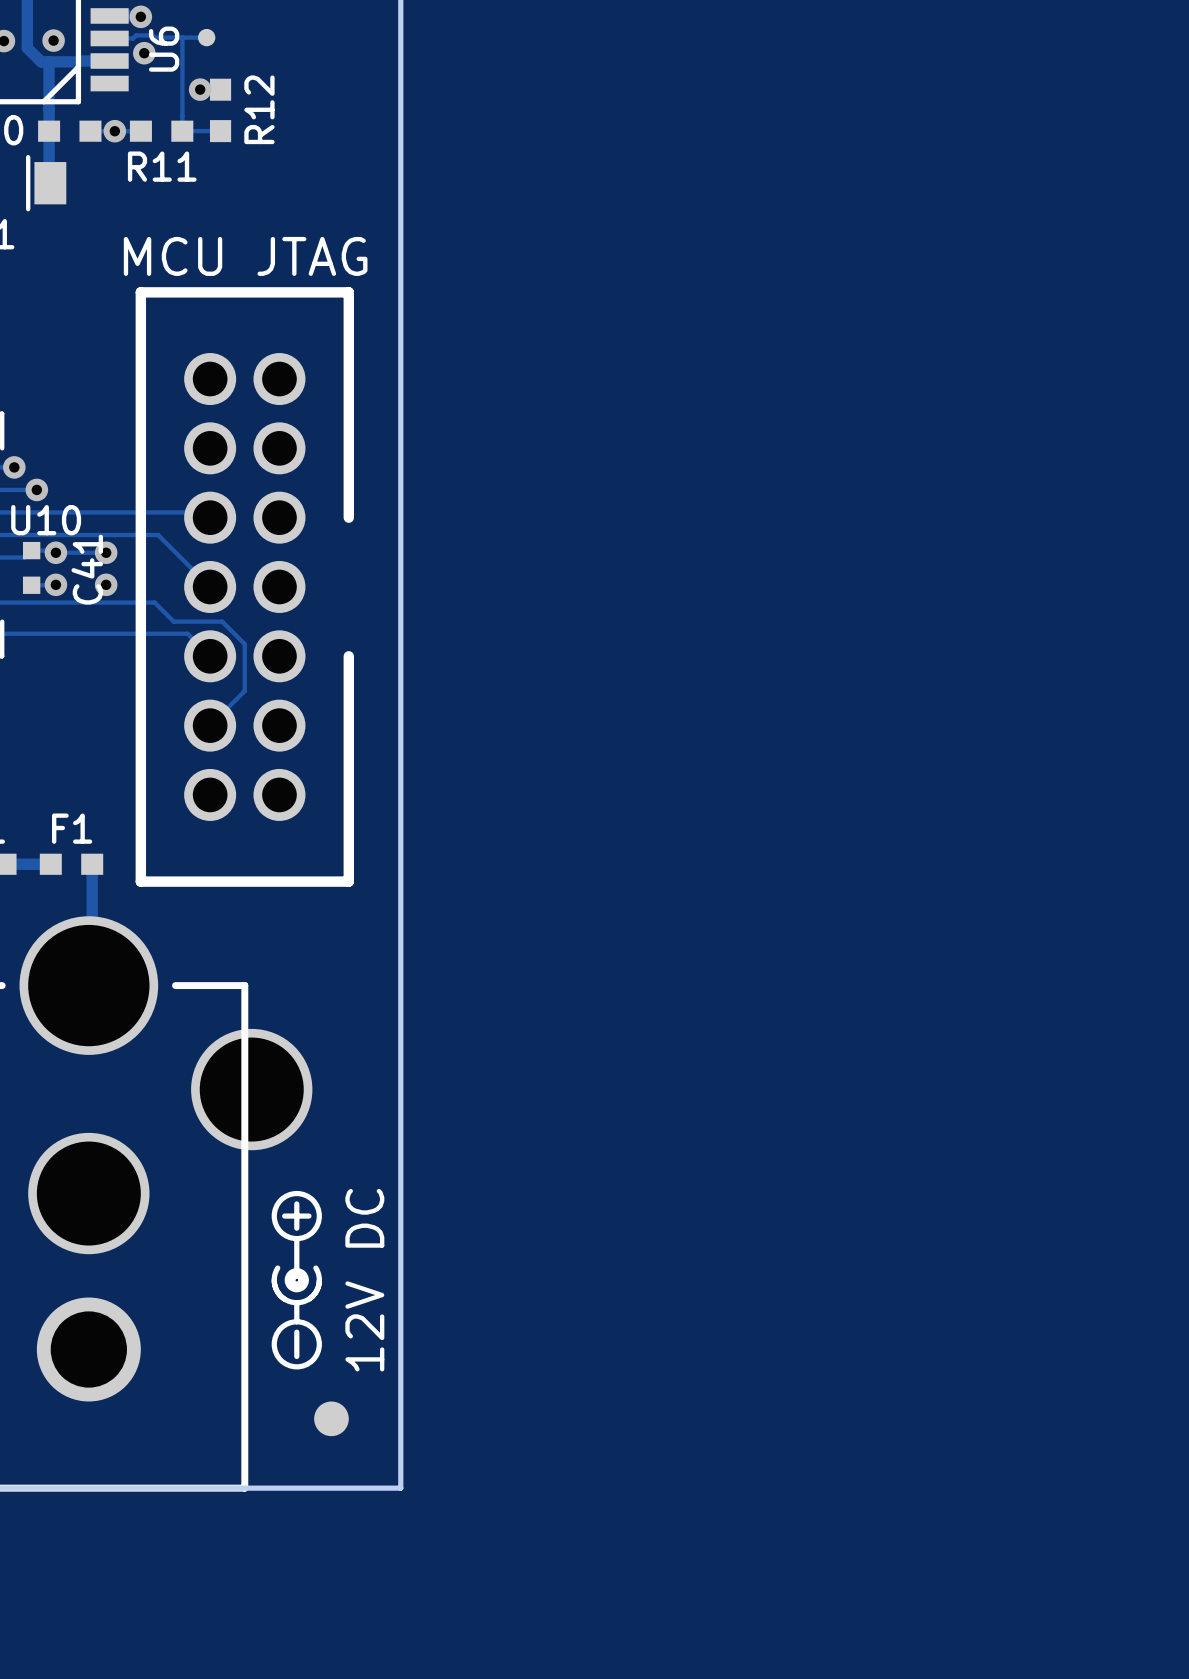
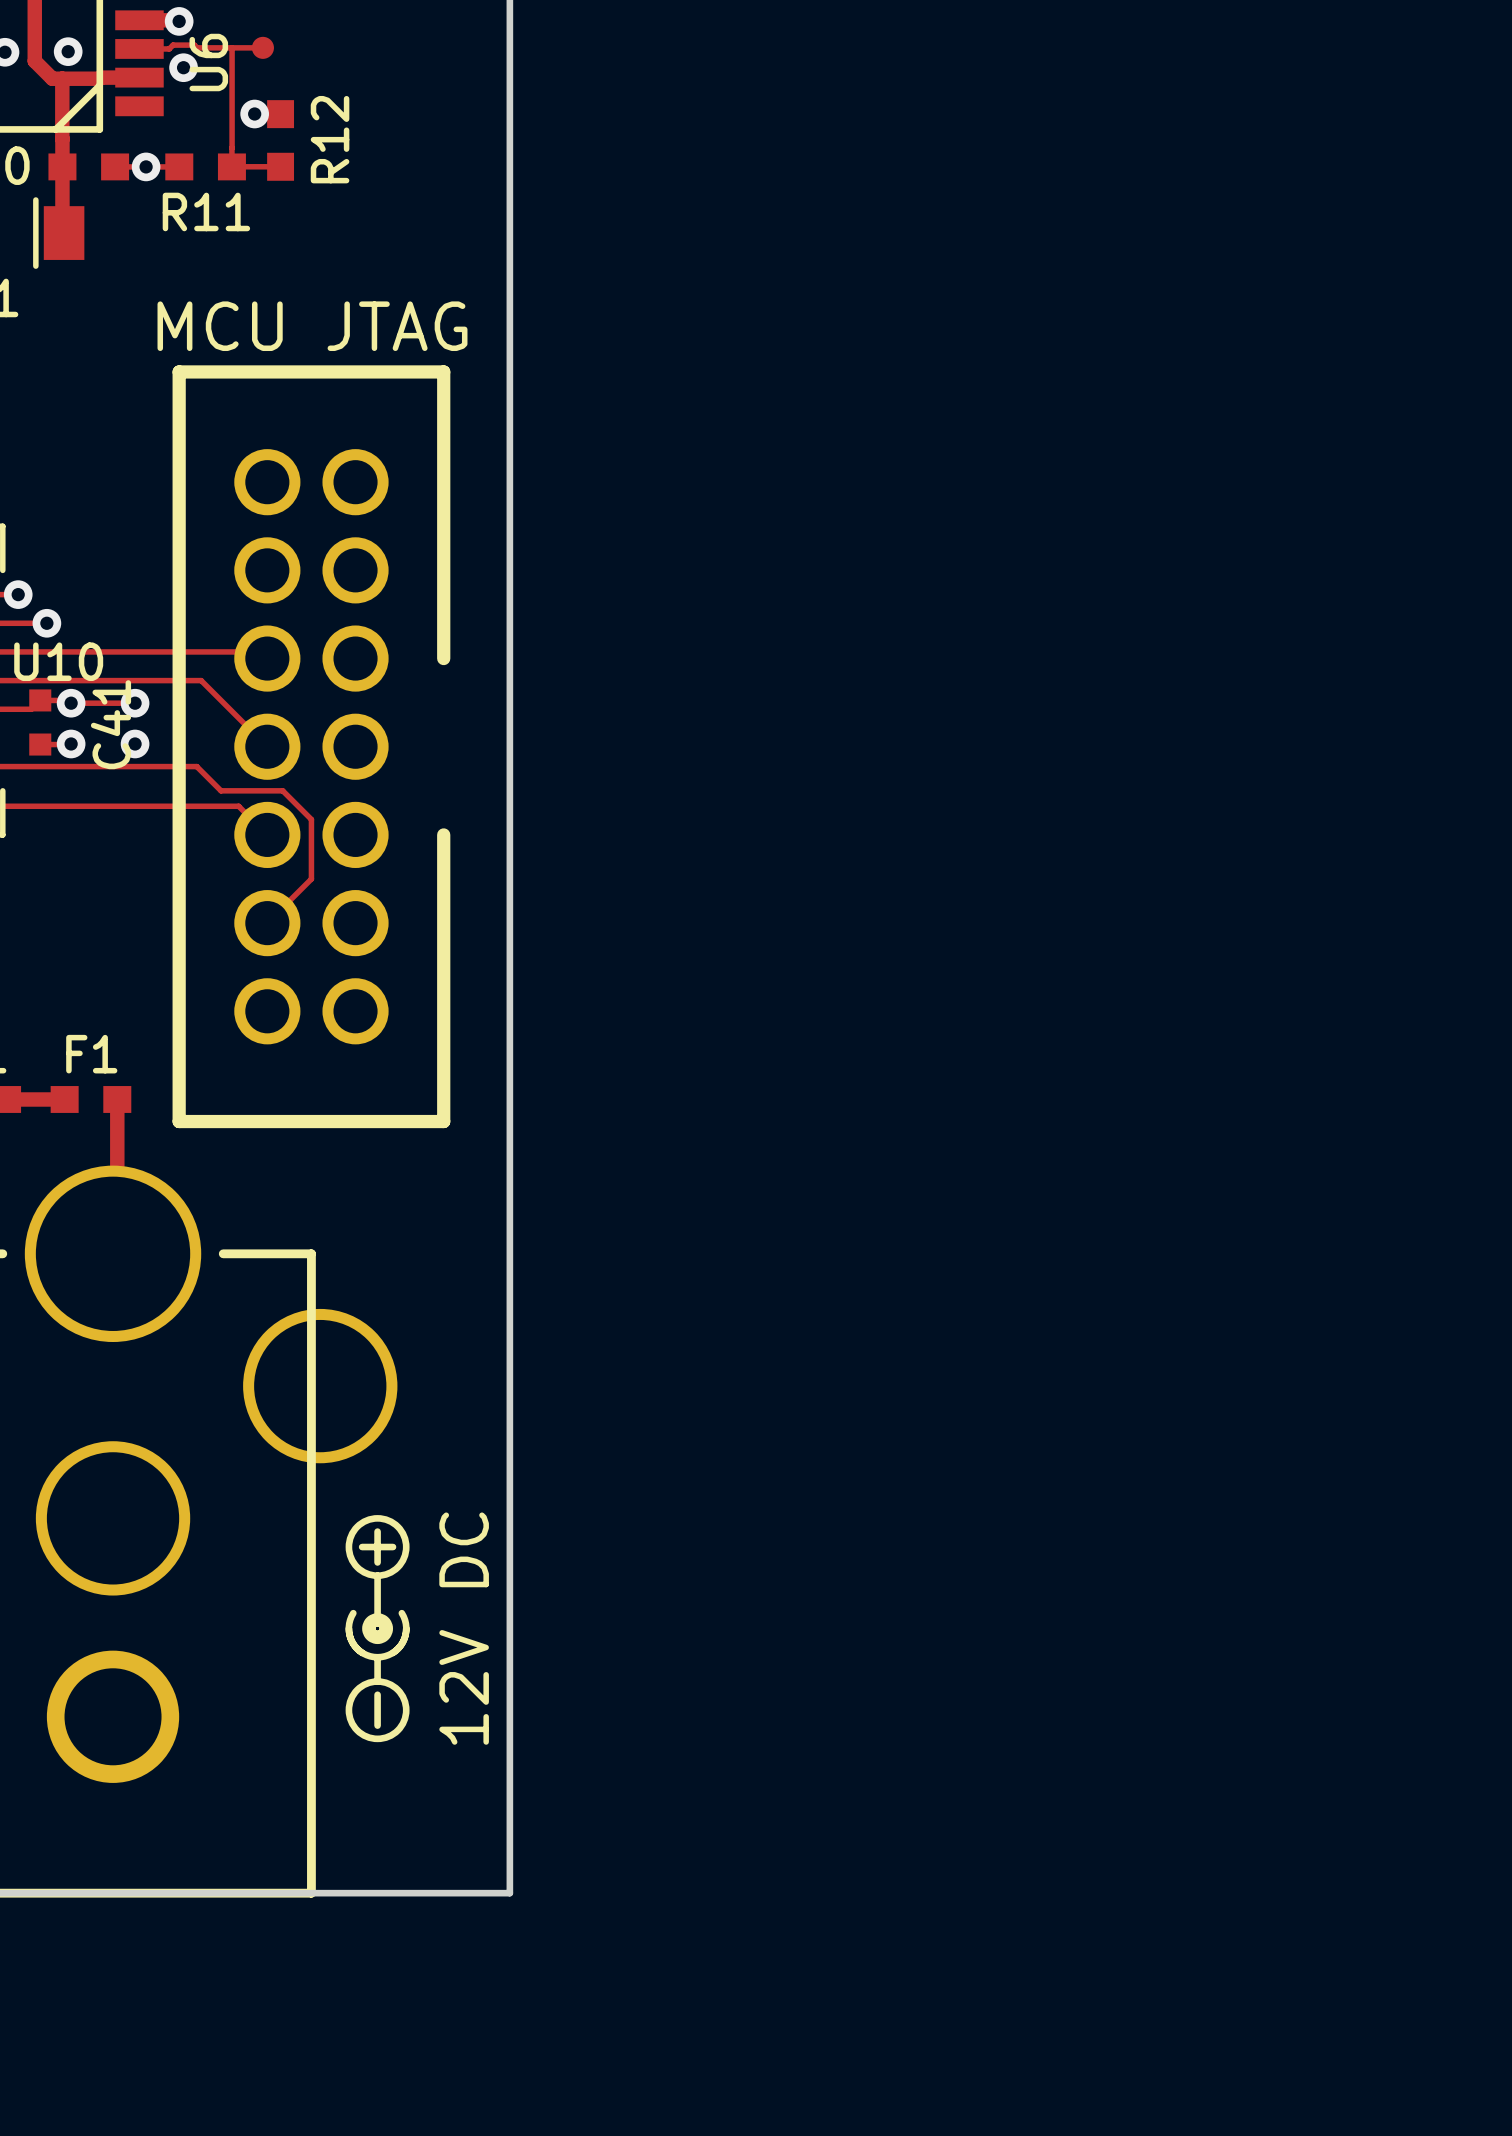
part: (331, 1418) -> none

